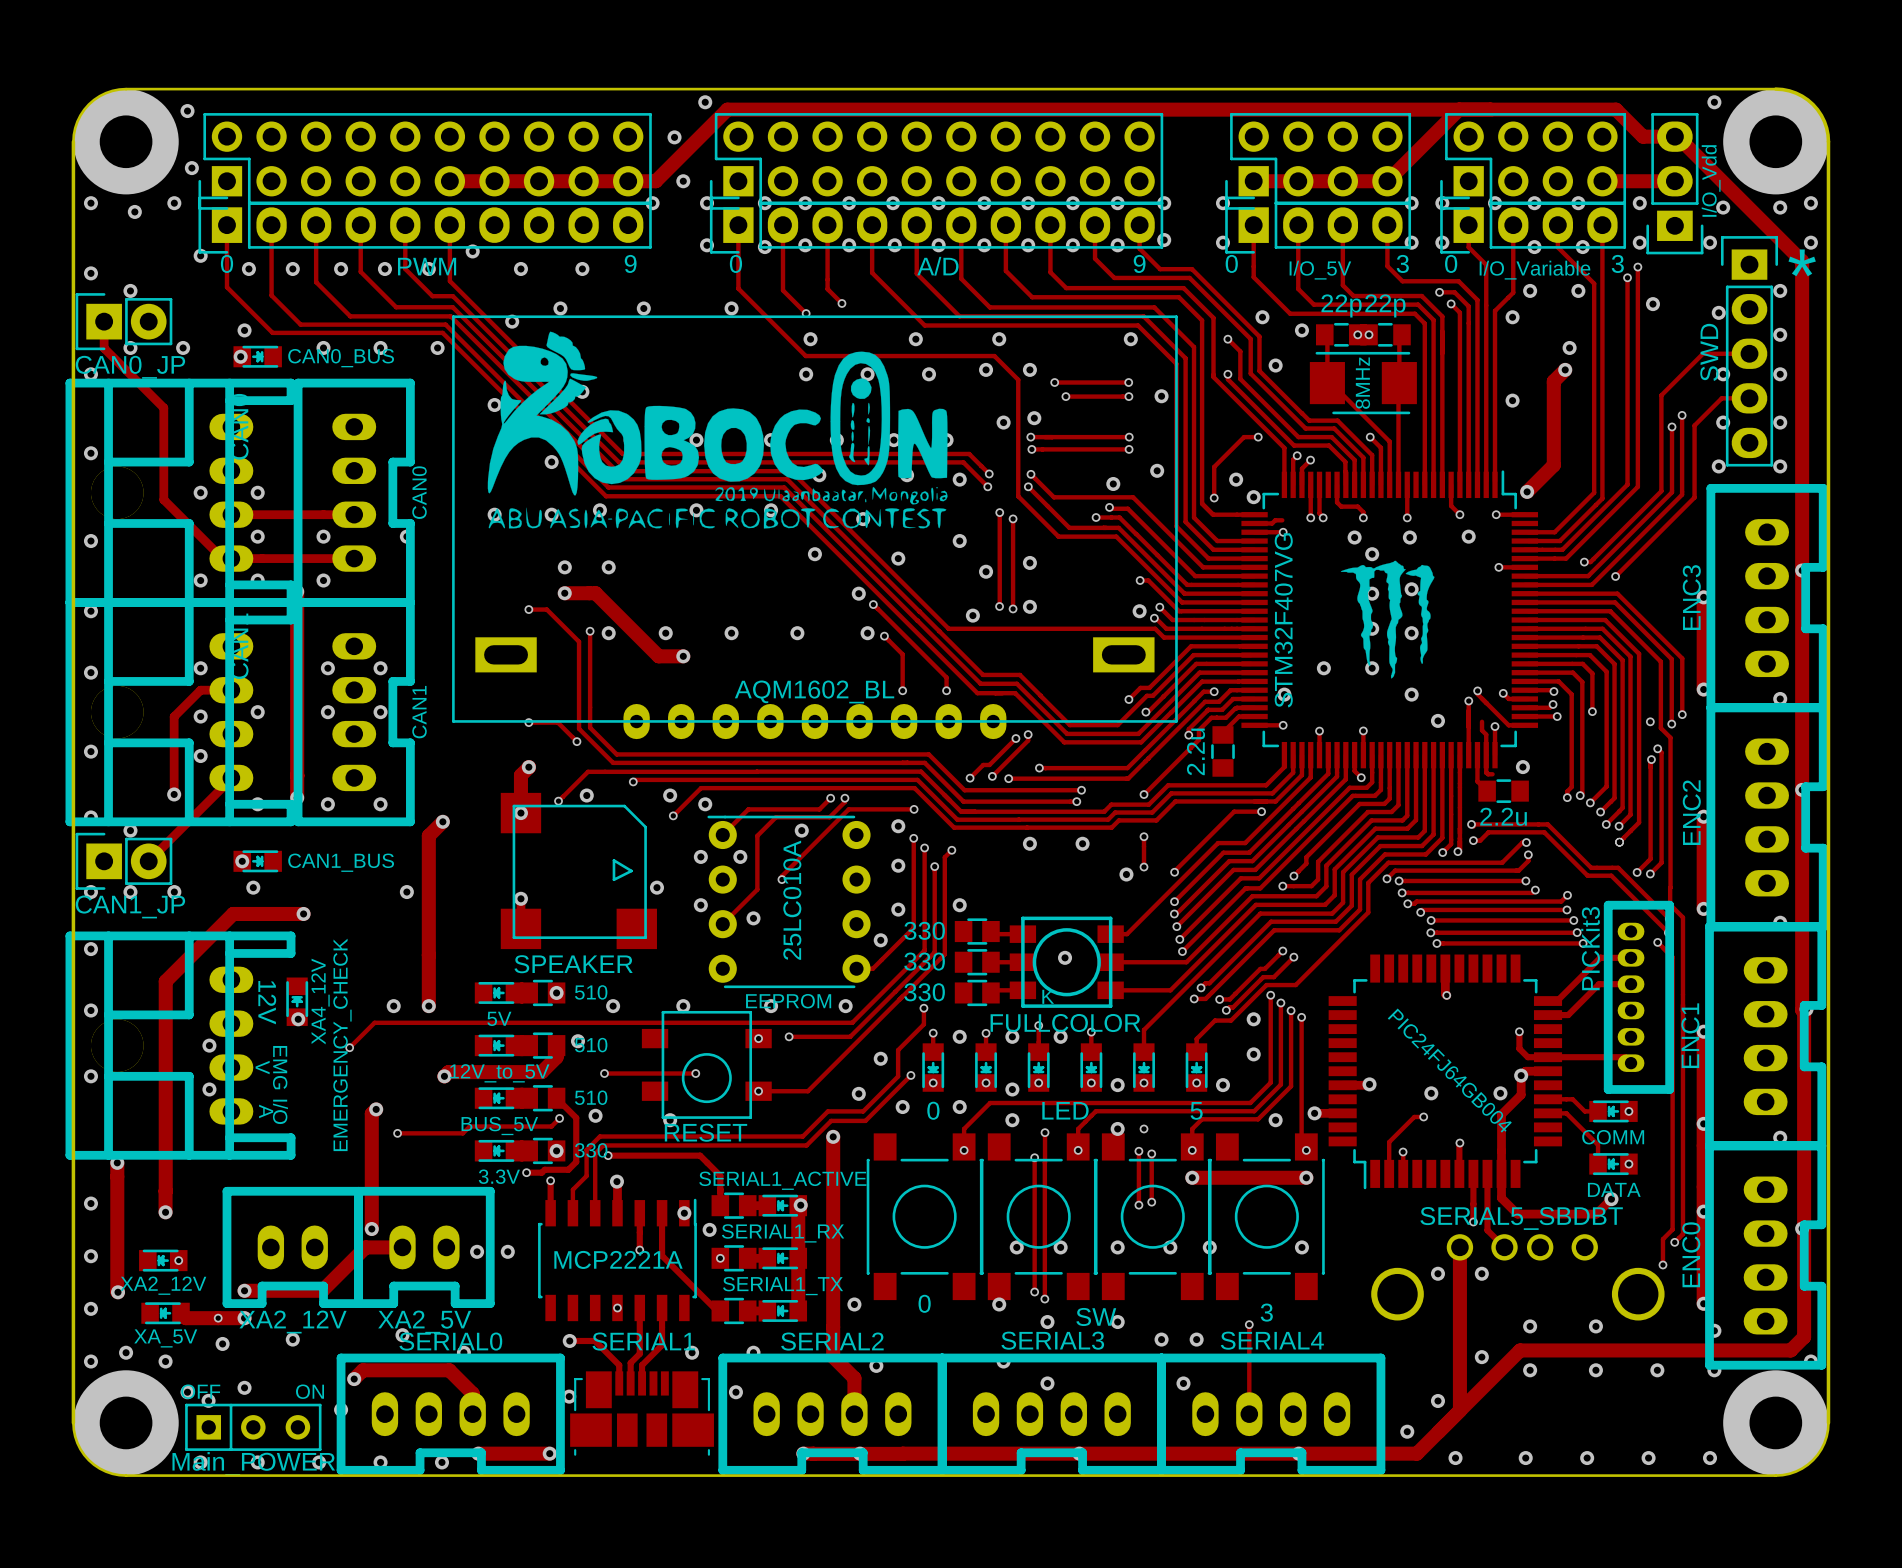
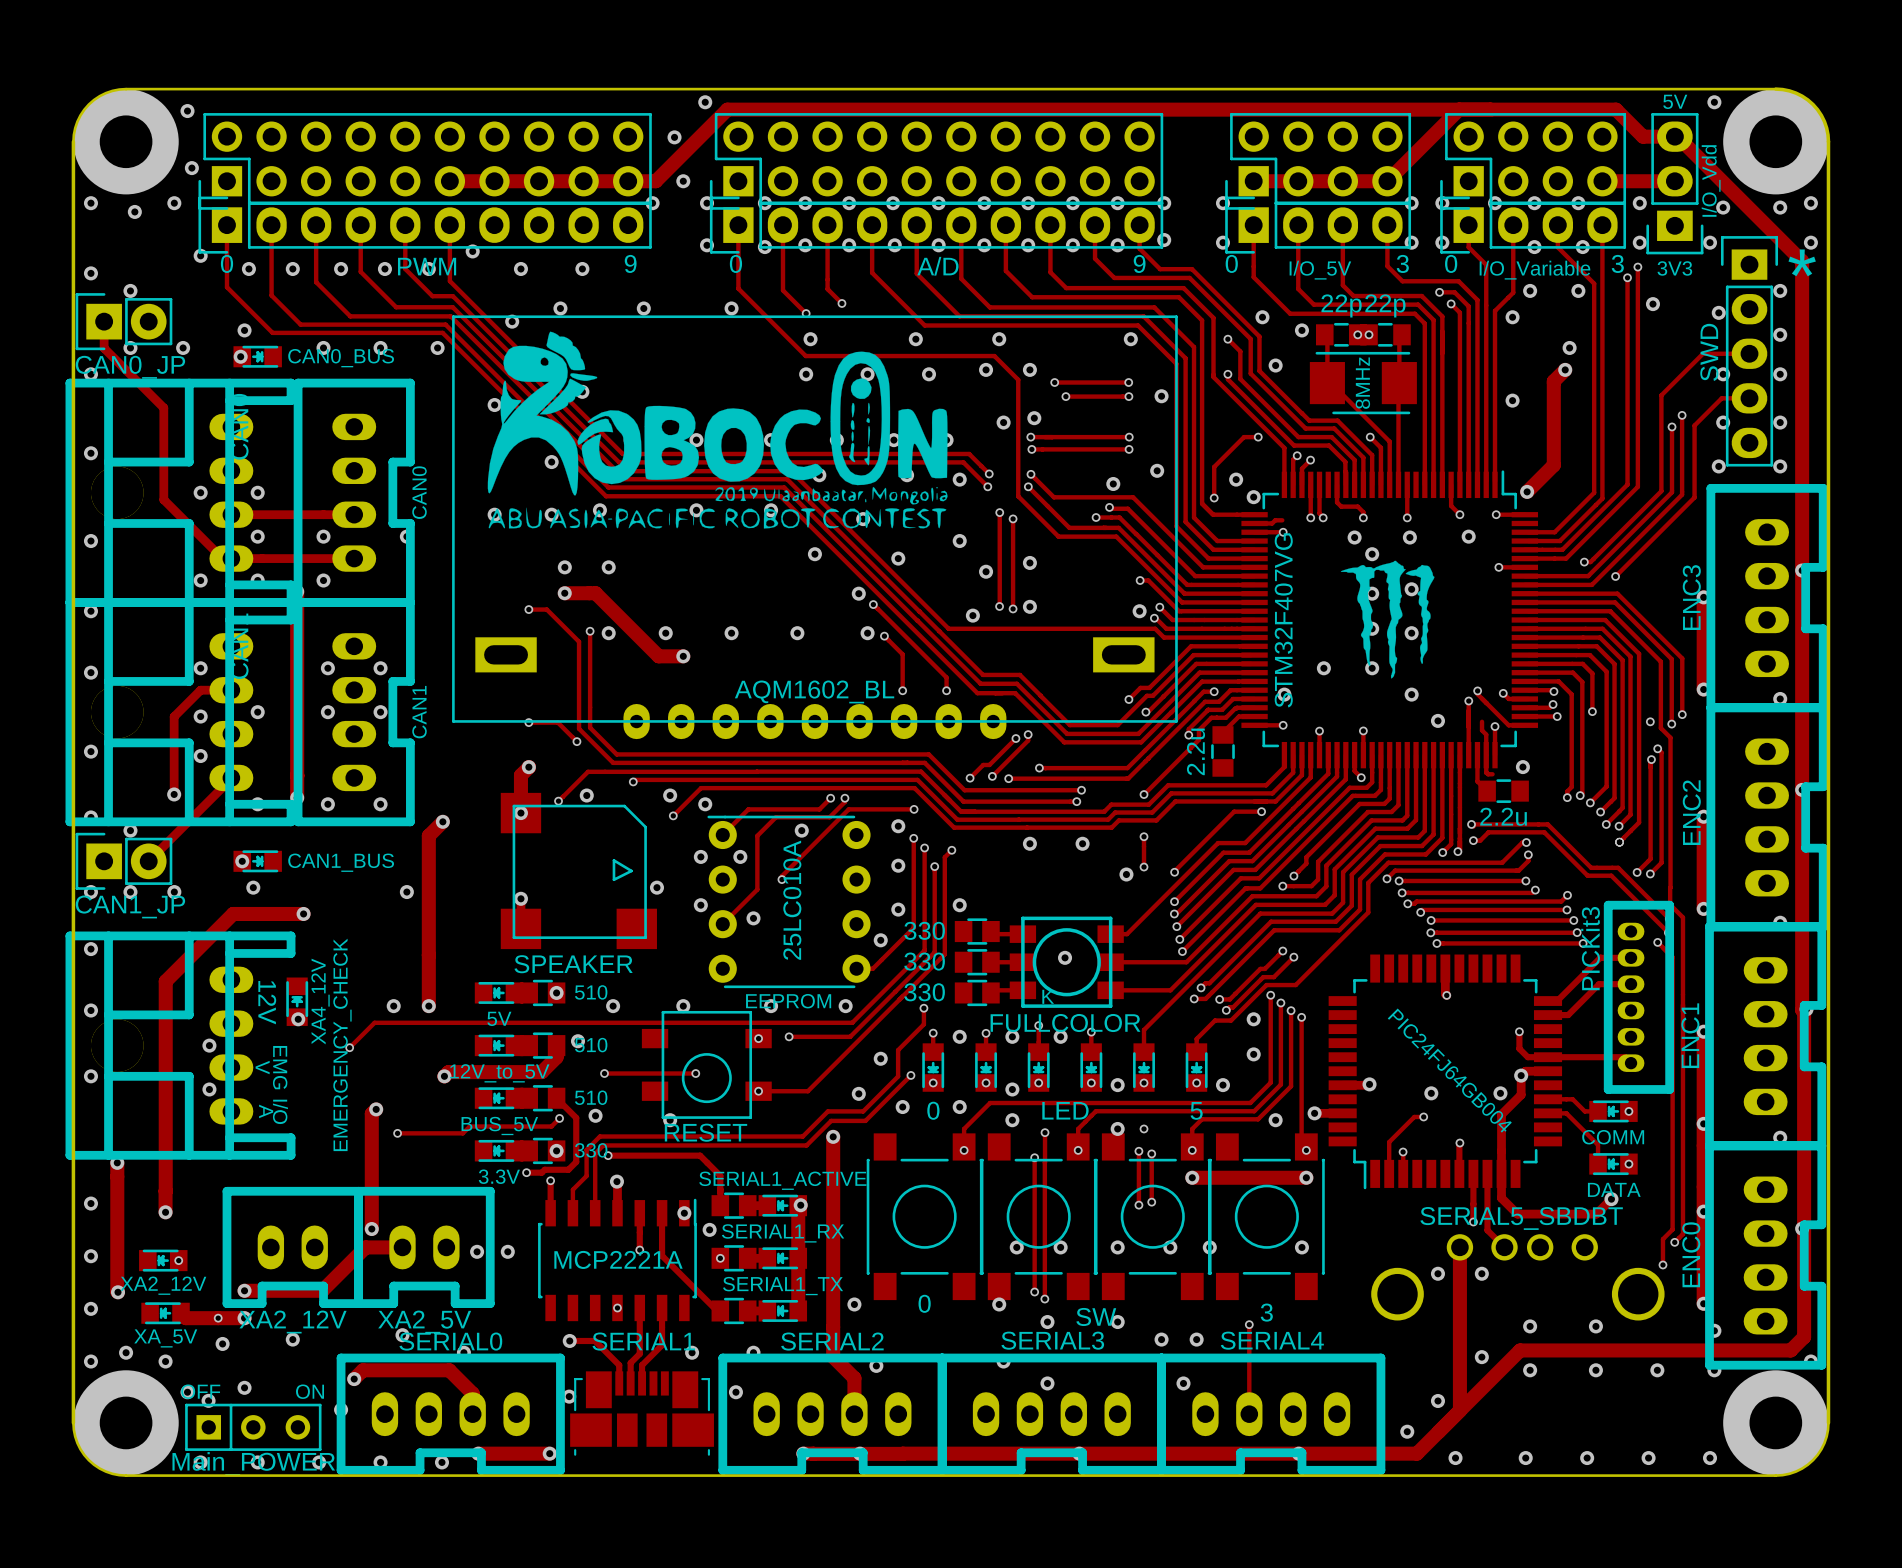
text: none -> 5V (1675, 101)
text: none -> 3V3 (1674, 268)

